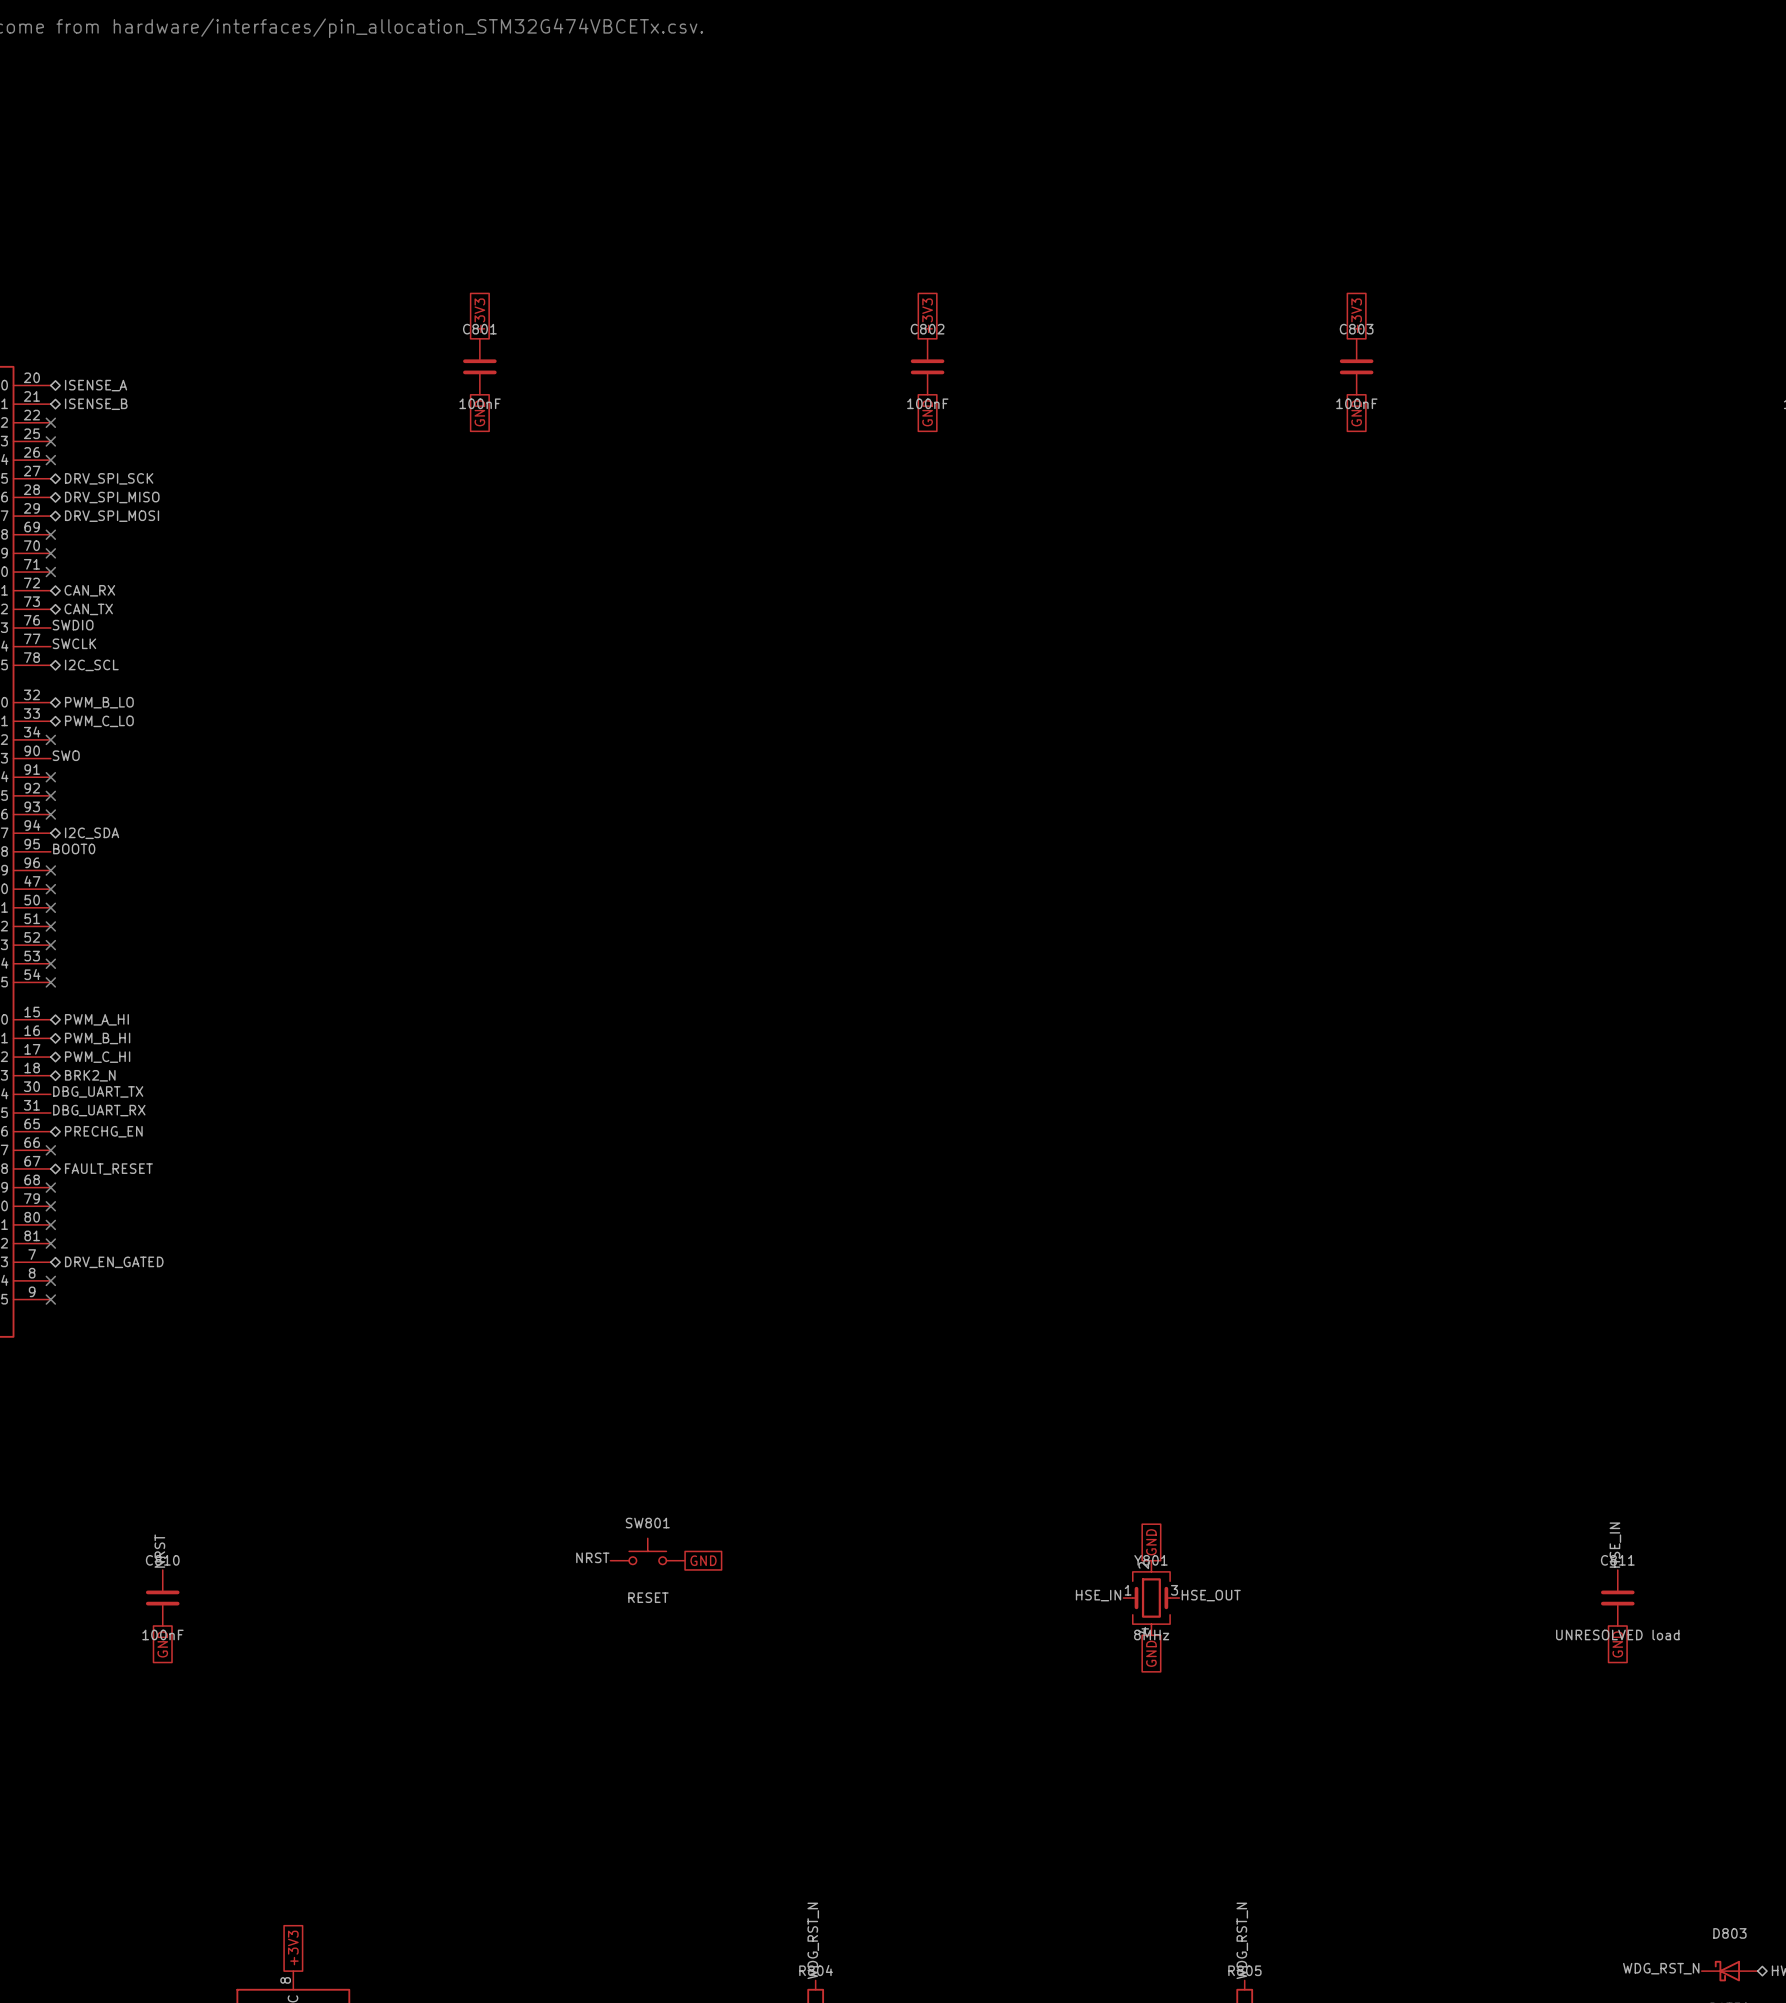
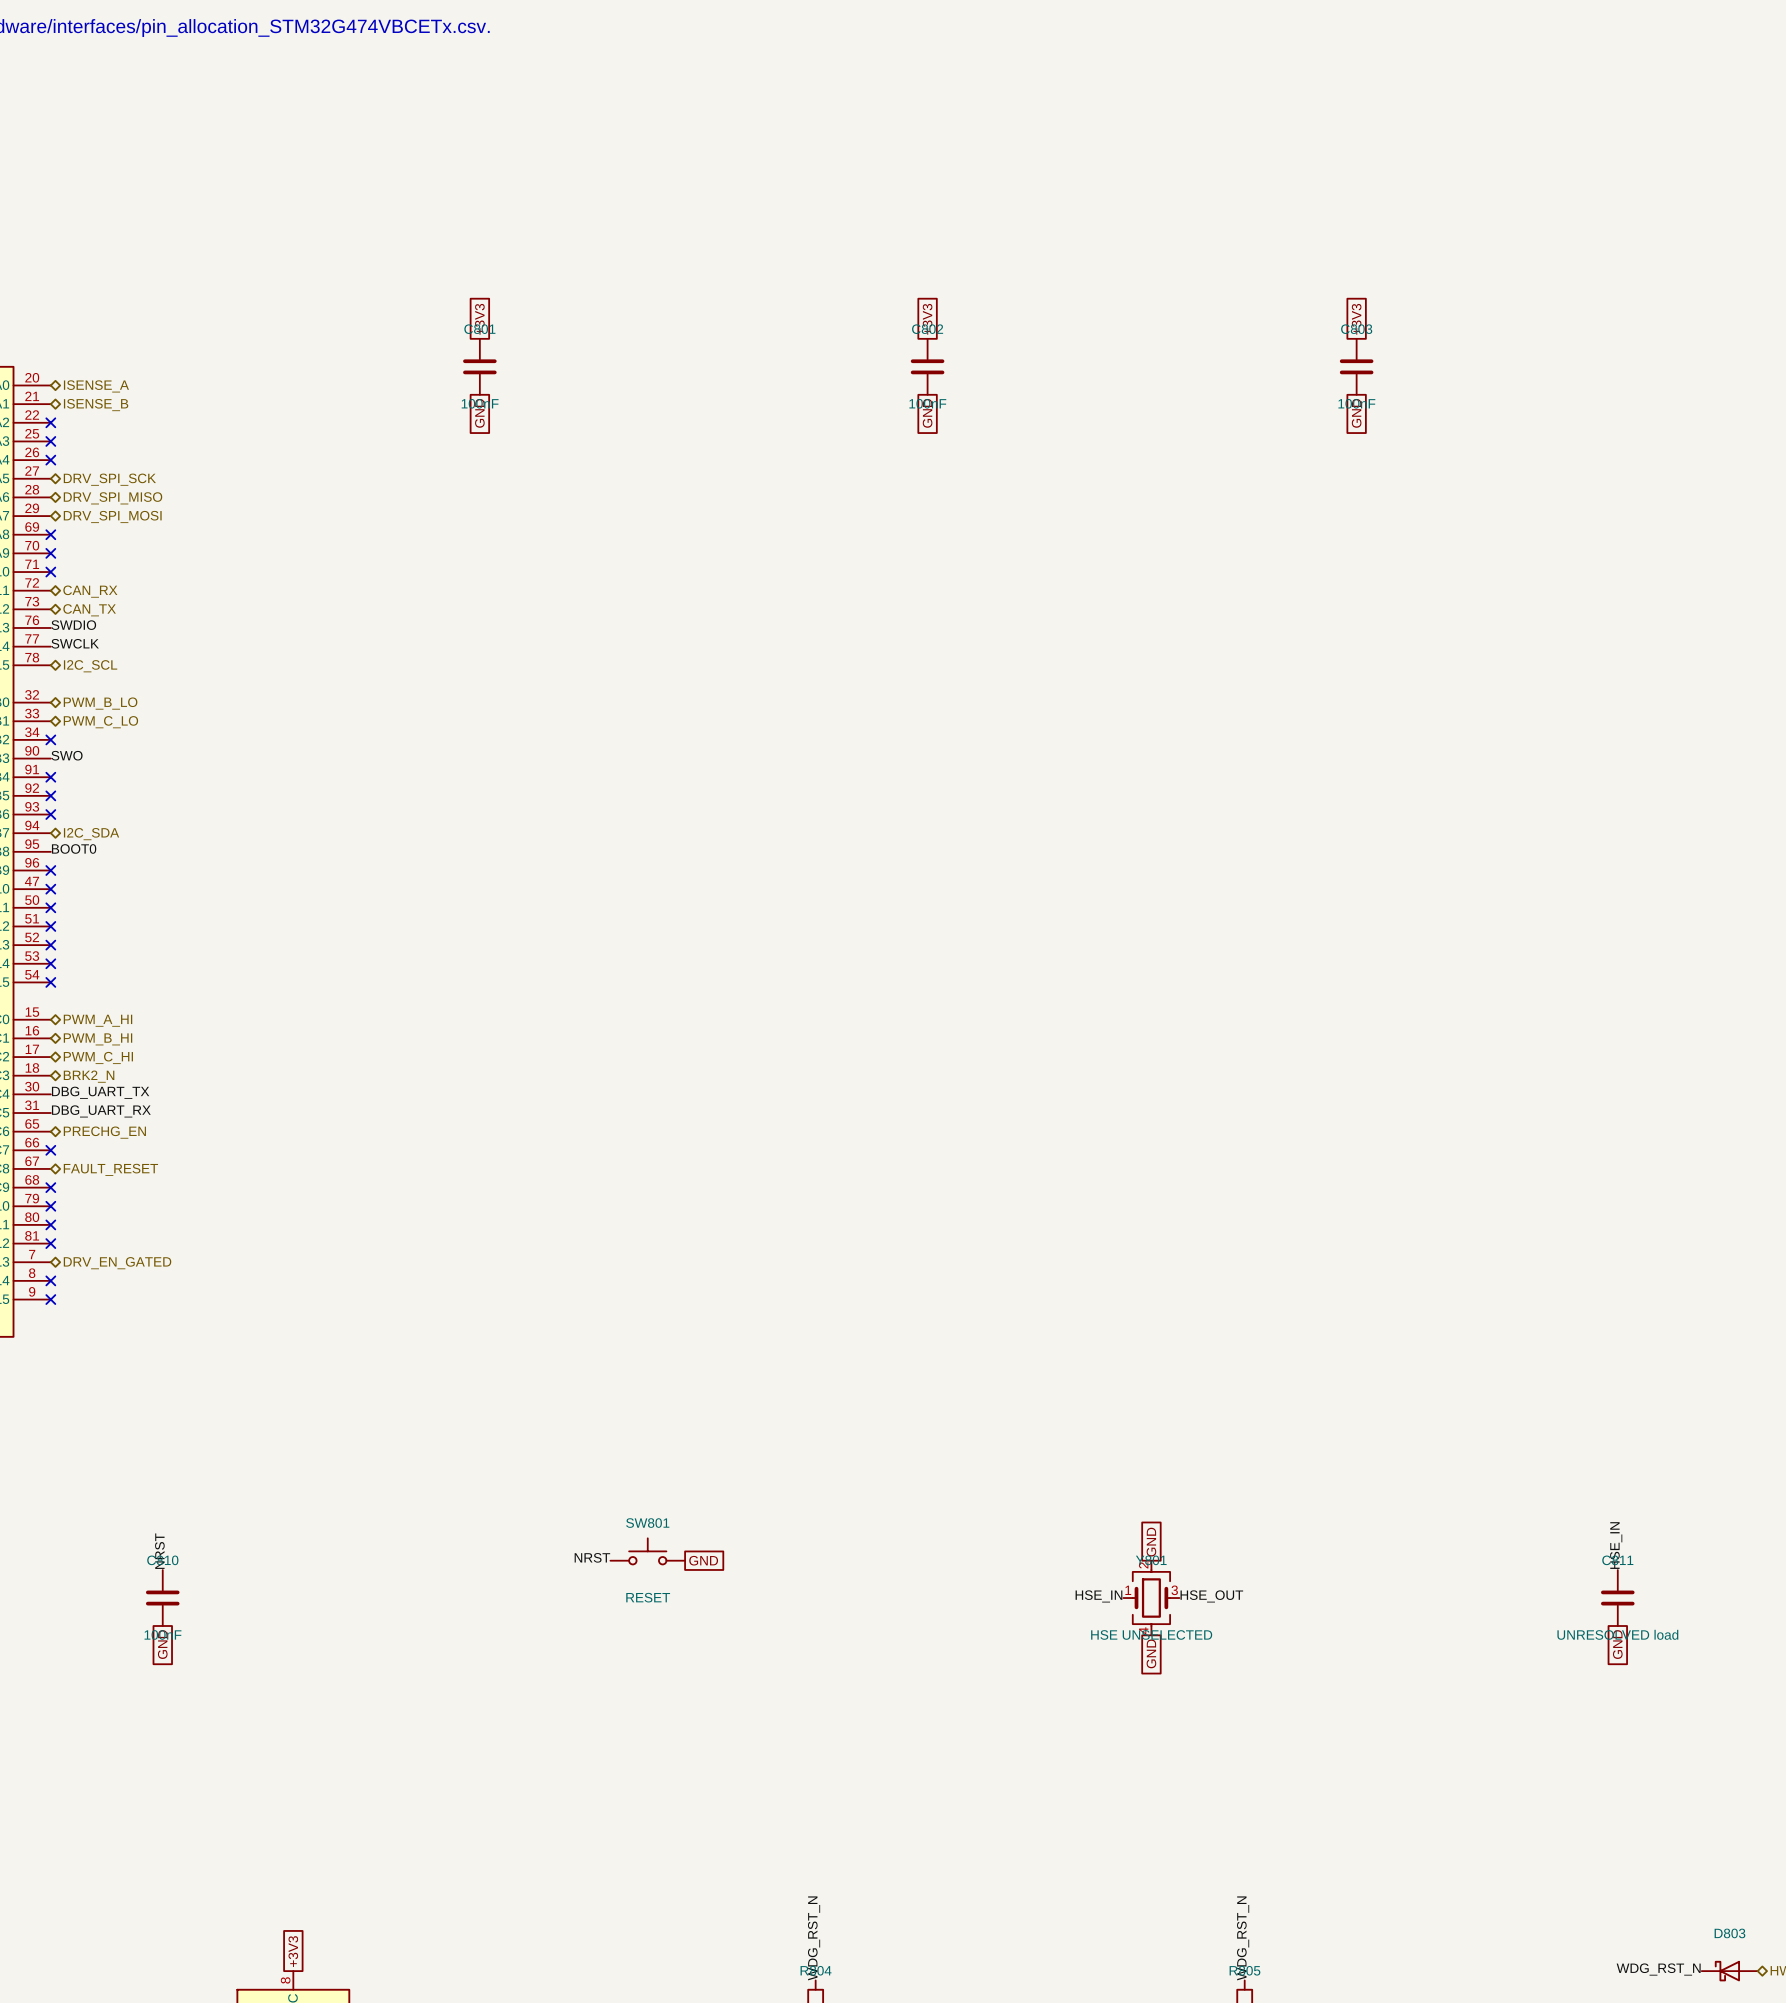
Y801 value: 8MHz (1151, 1634) -> HSE UNSELECTED (1151, 1634)

